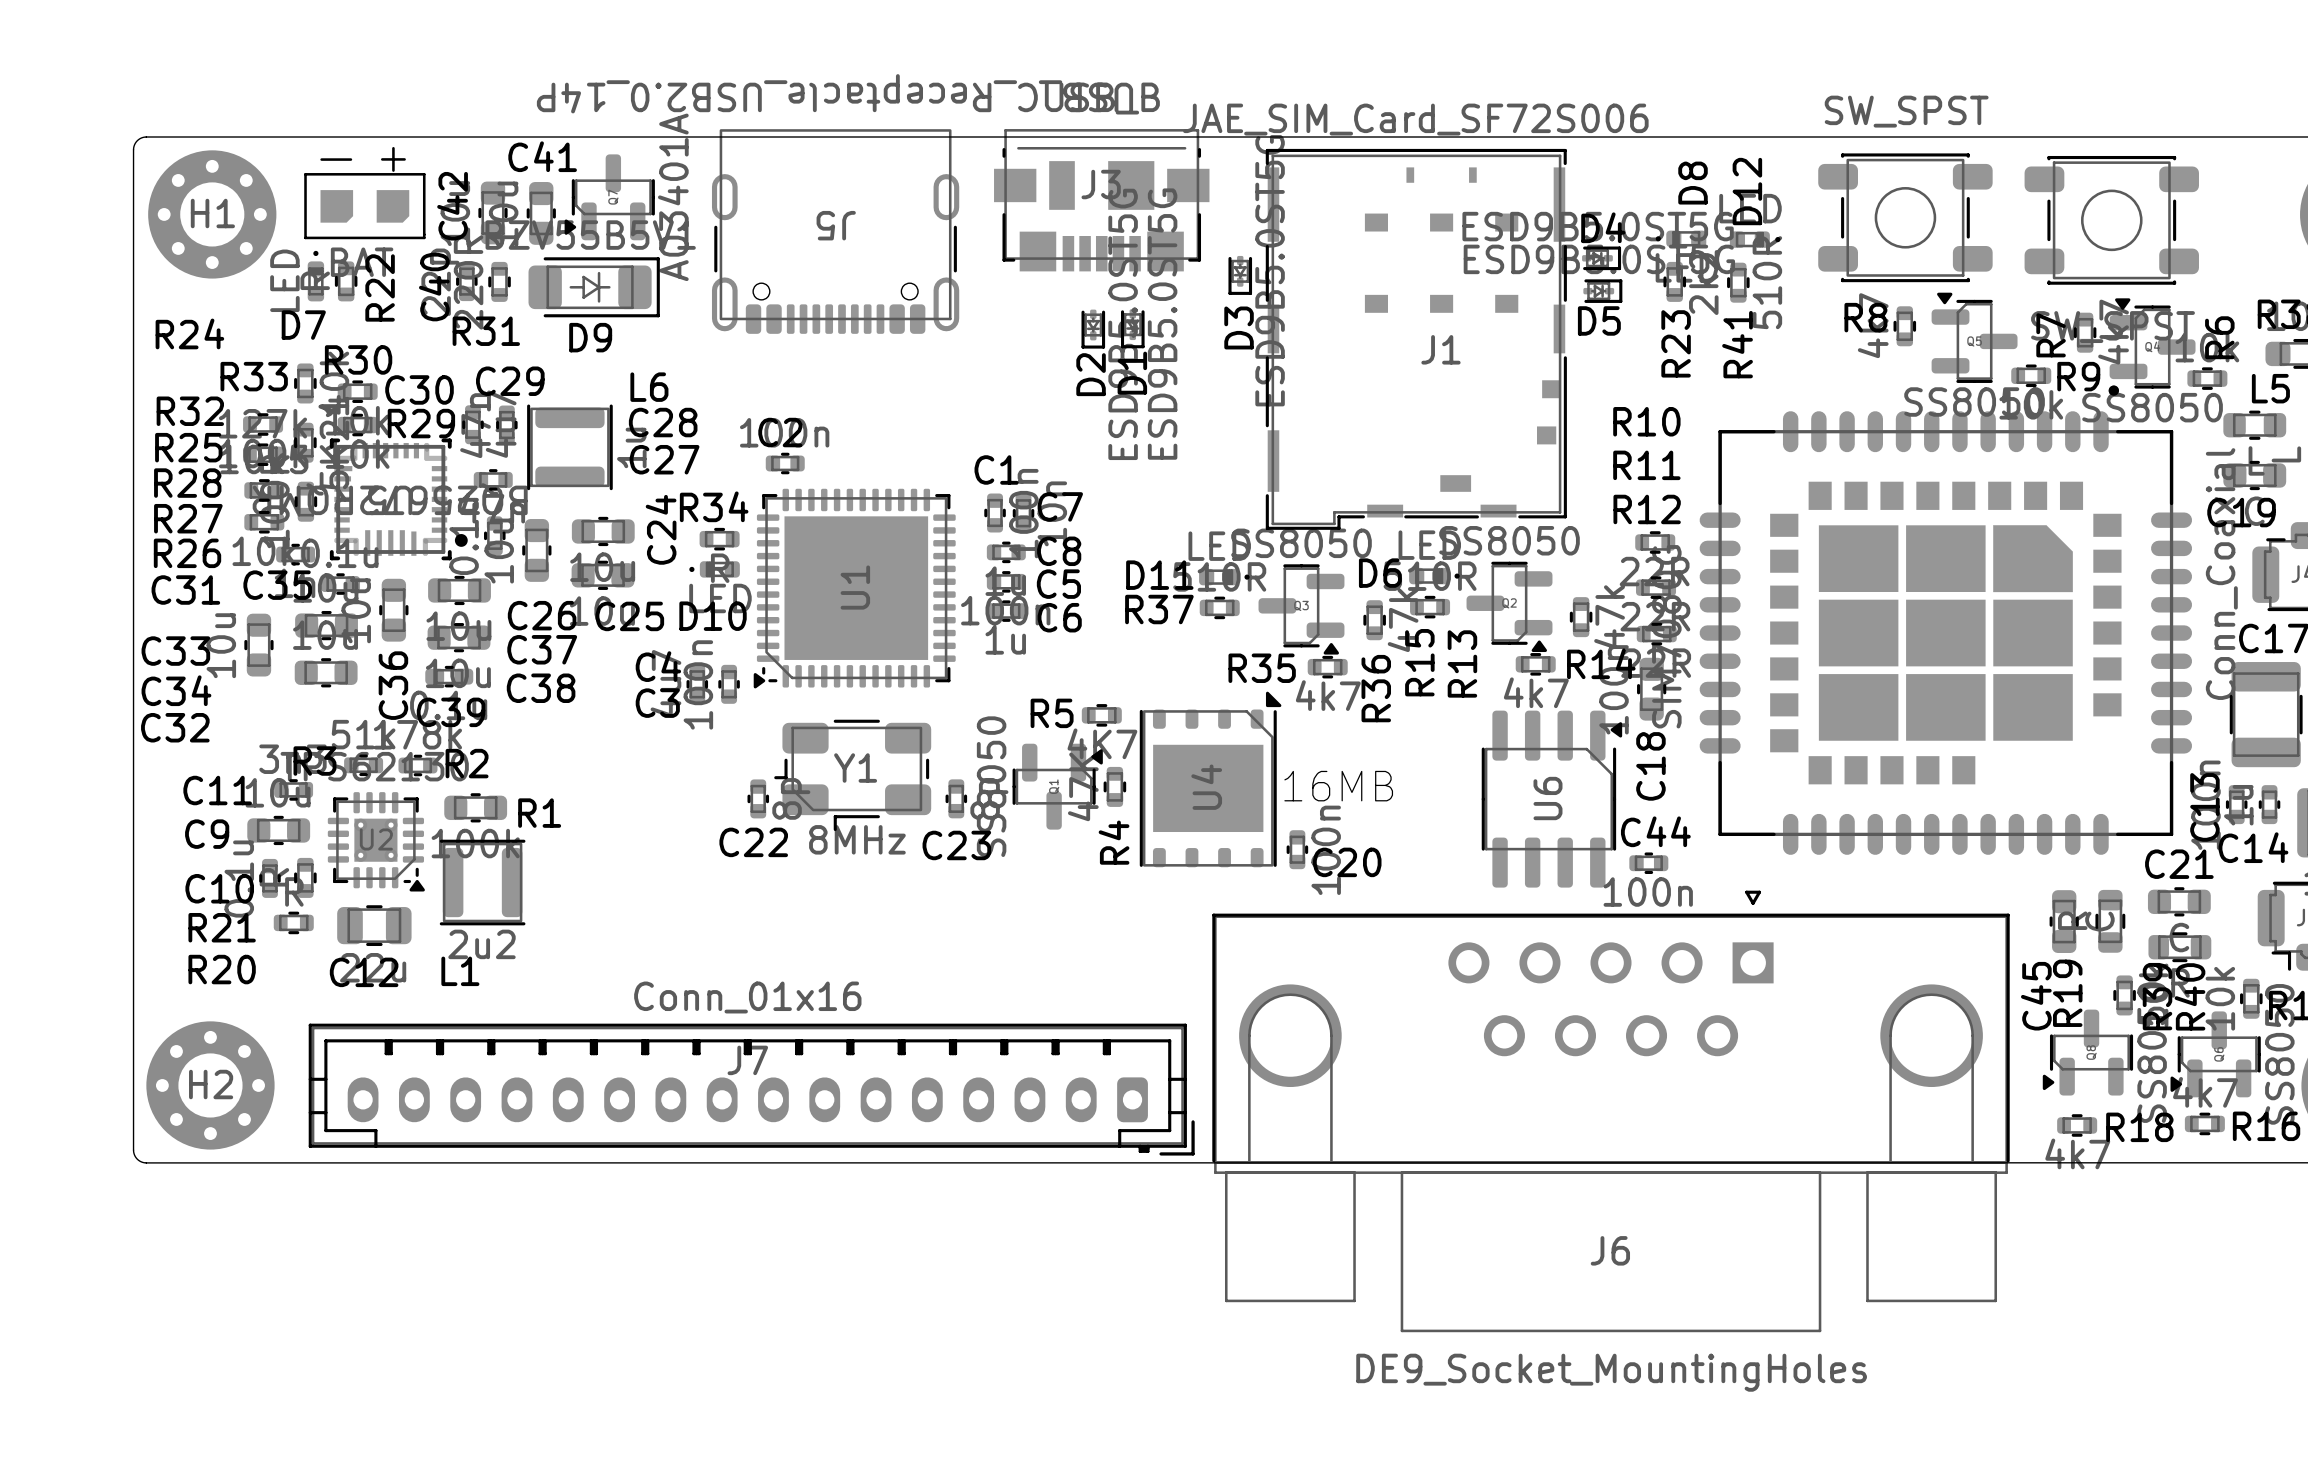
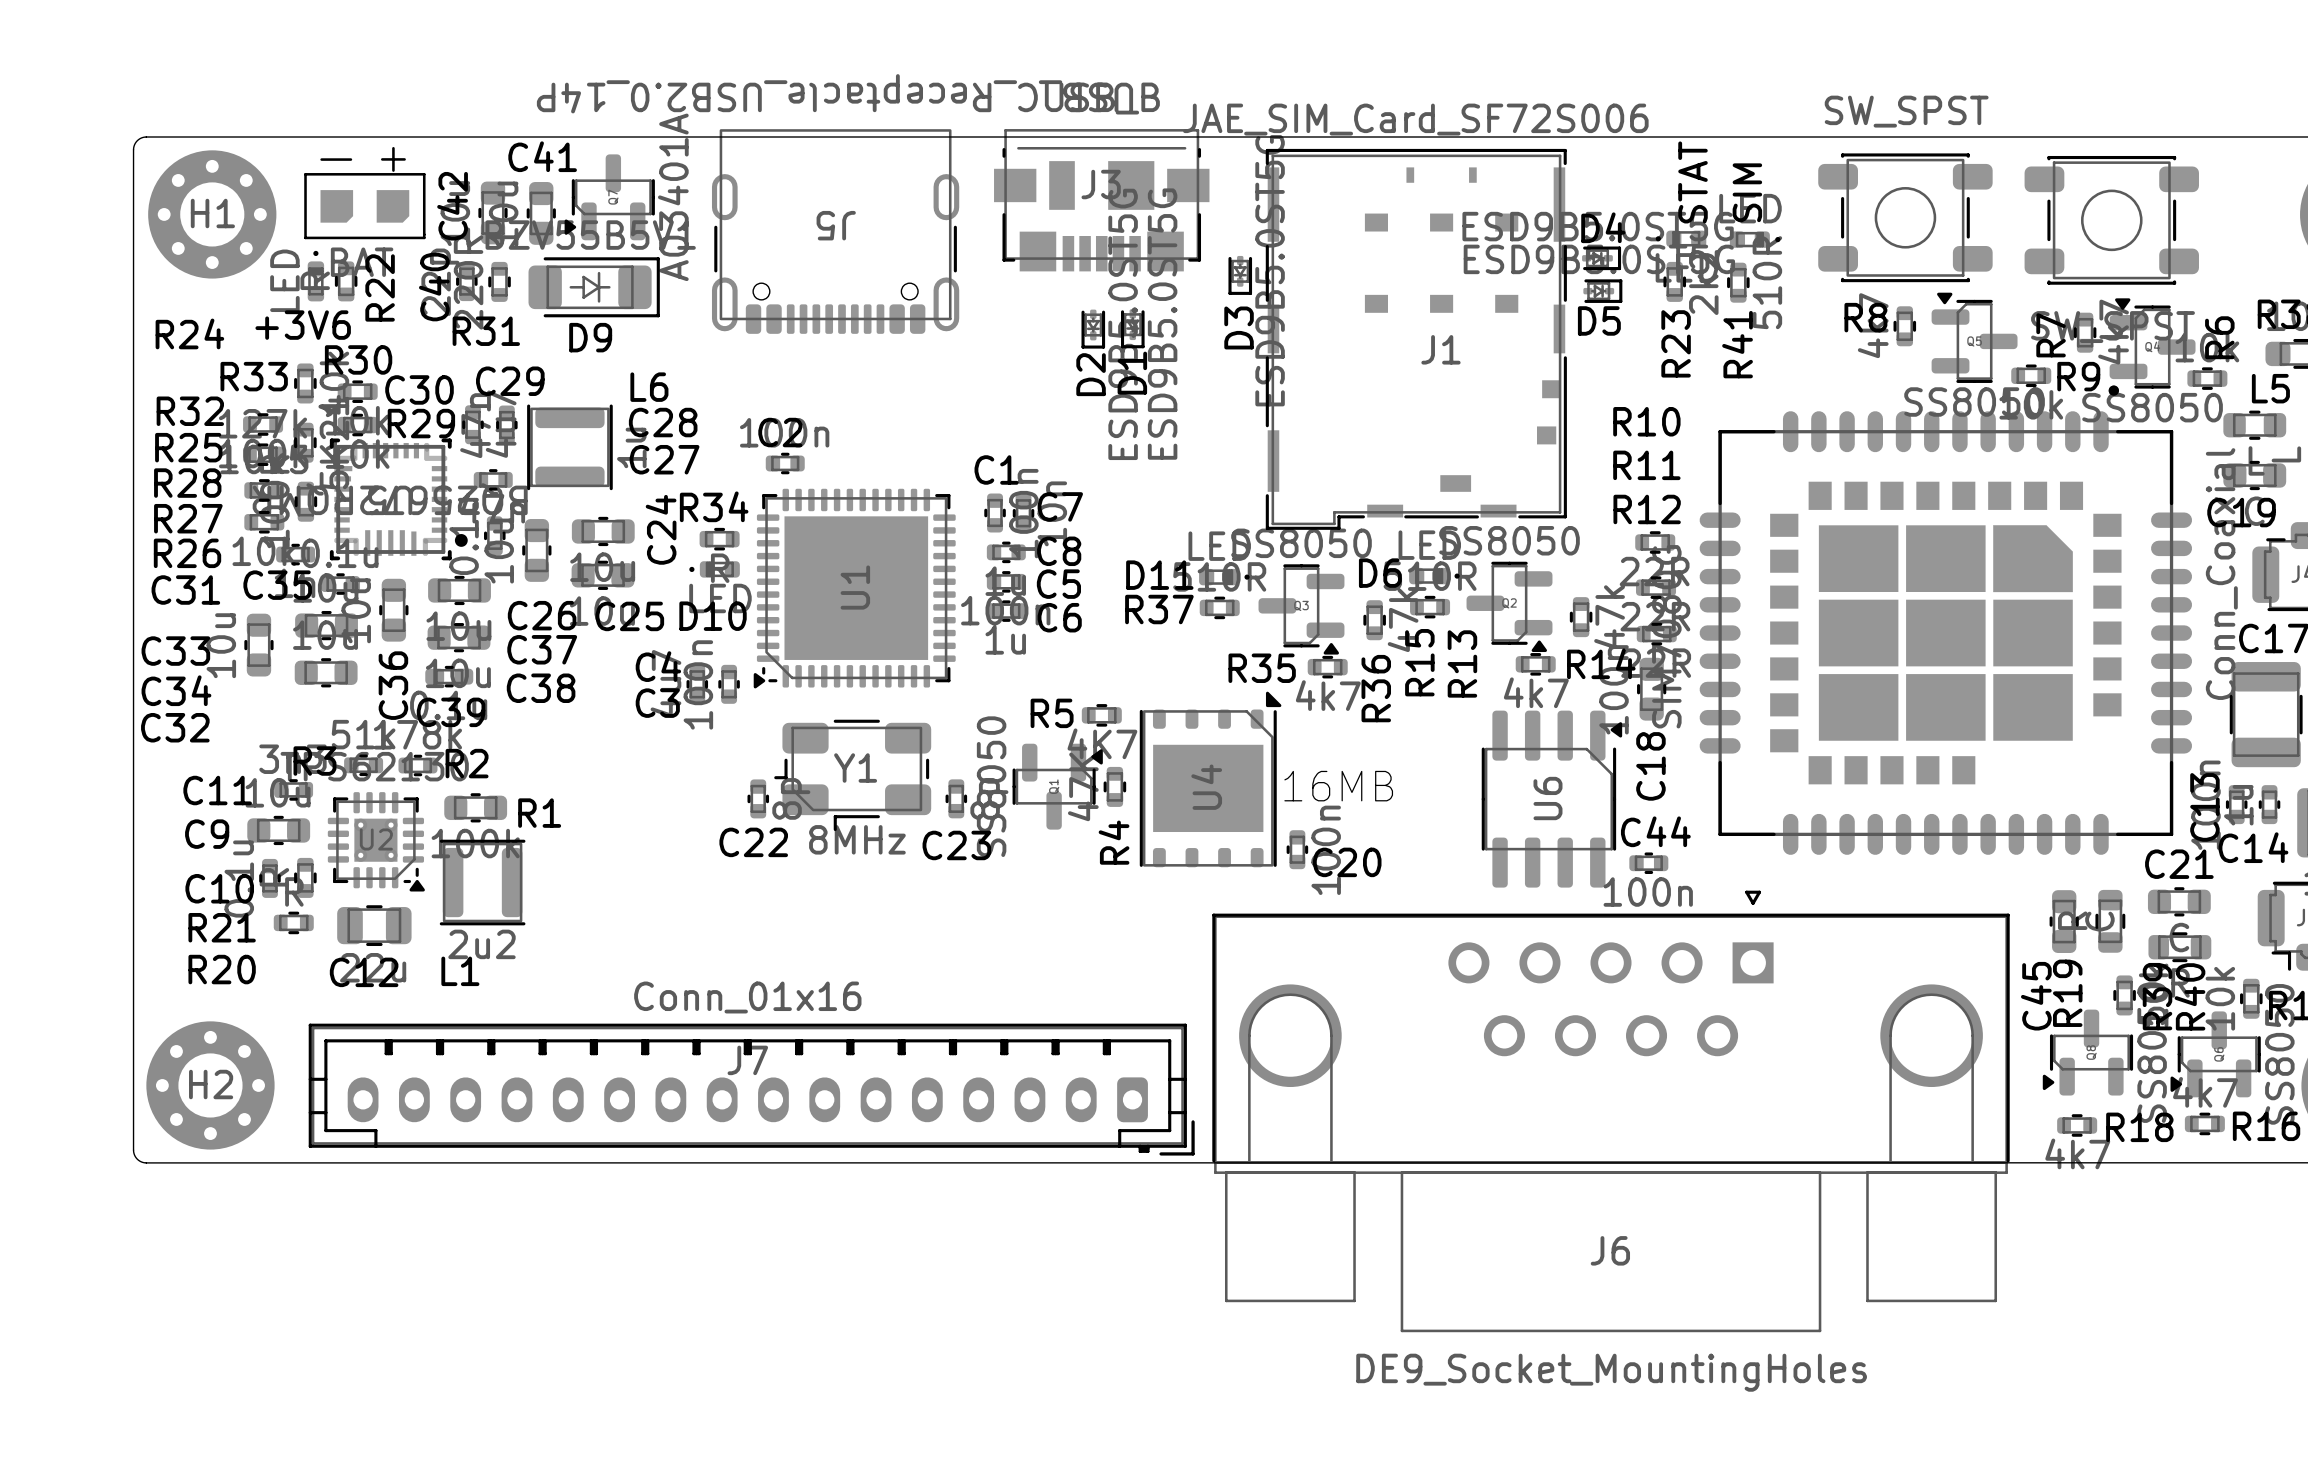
D8 name: D8 (1693, 183) -> STAT (1693, 182)
D12 name: D12 (1747, 191) -> SIM (1747, 192)
D7 name: D7 (303, 325) -> +3V6 (303, 325)

